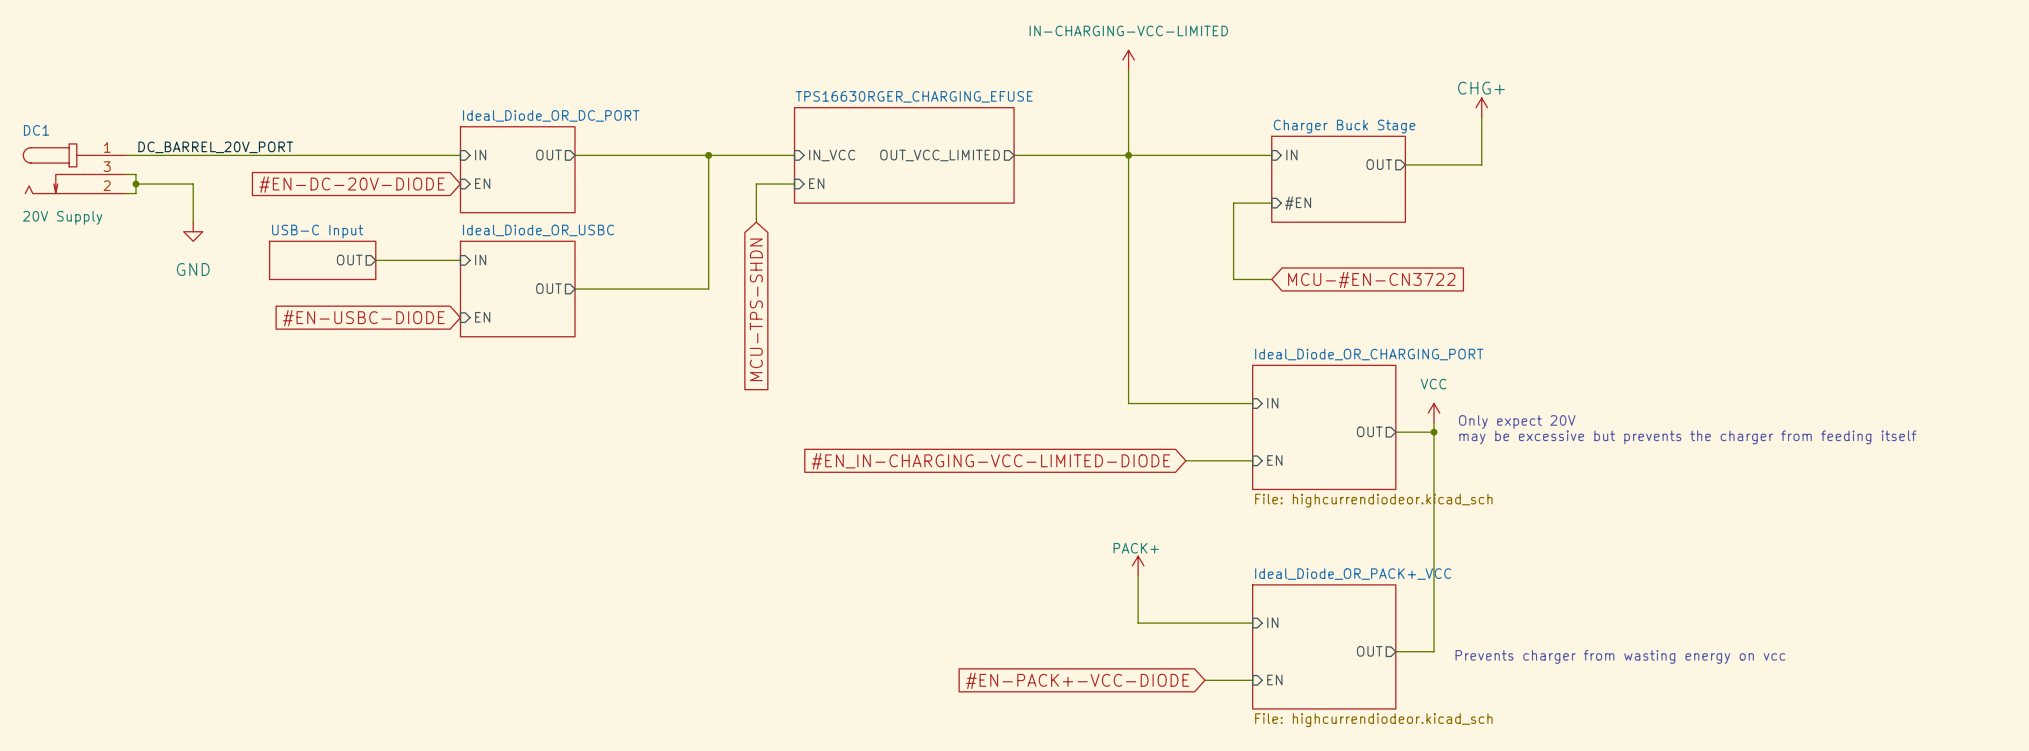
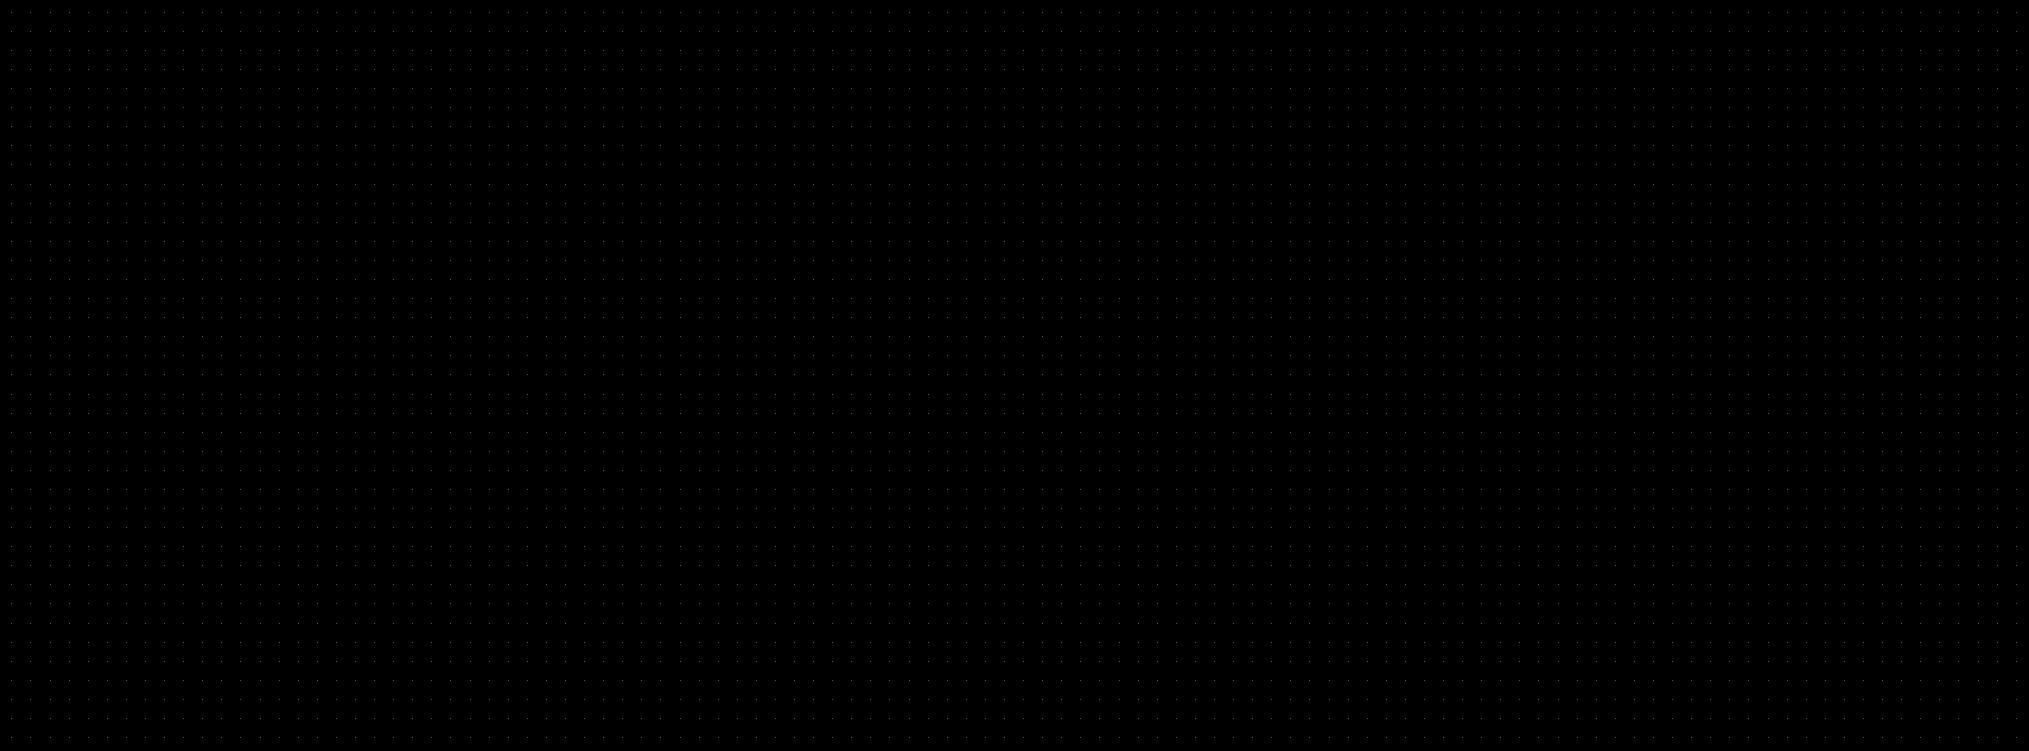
power symbol: IN-CHARGING-VCC-LIMITED (1128, 59) -> none
wire: (1128, 69) (1128, 403) (1252, 403) -> none
power symbol: CHG+ (1481, 107) -> none
wire: (1481, 117) (1481, 164) (1405, 164) -> none
label: DC_BARREL_20V_PORT (215, 147) -> none
wire: (126, 155) (460, 155) -> none
sheet pin: IN (480, 155) -> none
sheet pin: OUT (548, 155) -> none
wire: (575, 155) (794, 155) -> none
wire: (708, 155) (708, 289) (575, 289) -> none
junction: (708, 155) -> none
sheet pin: IN_VCC (832, 155) -> none
sheet TPS16630RGER_CHARGING_EFUSE: (904, 155) -> none
sheet pin: OUT_VCC_LIMITED (940, 155) -> none
wire: (1014, 155) (1271, 155) -> none
junction: (1128, 155) -> none
sheet pin: IN (1291, 155) -> none
sheet pin: OUT (1379, 164) -> none
DC1: 20V Supply (74, 168) -> none
sheet Ideal_Diode_OR_DC_PORT: (517, 169) -> none
wire: (126, 174) (135, 174) (135, 193) (126, 193) -> none
sheet Charger Buck Stage: (1338, 179) -> none
sheet pin: EN (482, 183) -> none
sheet pin: EN (816, 183) -> none
wire: (135, 184) (193, 184) (193, 222) -> none
junction: (135, 184) -> none
global label: #EN-DC-20V-DIODE (352, 184) -> none
wire: (794, 184) (756, 184) (756, 222) -> none
wire: (1271, 203) (1233, 203) (1233, 279) (1271, 279) -> none
sheet pin: #EN (1298, 203) -> none
power symbol: GND (193, 231) -> none
sheet USB-C Input: (322, 260) -> none
sheet pin: OUT (349, 260) -> none
wire: (375, 260) (460, 260) -> none
sheet pin: IN (480, 260) -> none
global label: MCU-#EN-CN3722 (1371, 280) -> none
sheet pin: OUT (548, 288) -> none
sheet Ideal_Diode_OR_USBC: (517, 289) -> none
global label: MCU-TPS-SHDN (756, 309) -> none
sheet pin: EN (482, 317) -> none
global label: #EN-USBC-DIODE (363, 318) -> none
sheet pin: IN (1272, 403) -> none
power symbol: VCC (1434, 413) -> none
wire: (1434, 422) (1434, 651) (1395, 651) -> none
text: Only expect 20V (1517, 422) -> none
sheet Ideal_Diode_OR_CHARGING_PORT: File: highcurrendiodeor.kicad_sch (1324, 427) -> none
sheet pin: OUT (1369, 431) -> none
wire: (1395, 432) (1434, 432) -> none
junction: (1434, 432) -> none
text: may be excessive but prevents the charger from feeding itself (1687, 437) -> none
wire: (1185, 460) (1252, 460) -> none
sheet pin: EN (1274, 460) -> none
global label: #EN_IN-CHARGING-VCC-LIMITED-DIODE (990, 461) -> none
power symbol: PACK+ (1138, 565) -> none
wire: (1138, 575) (1138, 623) (1252, 623) -> none
sheet pin: IN (1272, 622) -> none
sheet Ideal_Diode_OR_PACK+_VCC: File: highcurrendiodeor.kicad_sch (1324, 646) -> none
sheet pin: OUT (1369, 651) -> none
text: Prevents charger from wasting energy on vcc (1620, 656) -> none
sheet pin: EN (1274, 679) -> none
global label: #EN-PACK+-VCC-DIODE (1077, 680) -> none
wire: (1204, 680) (1252, 680) -> none

